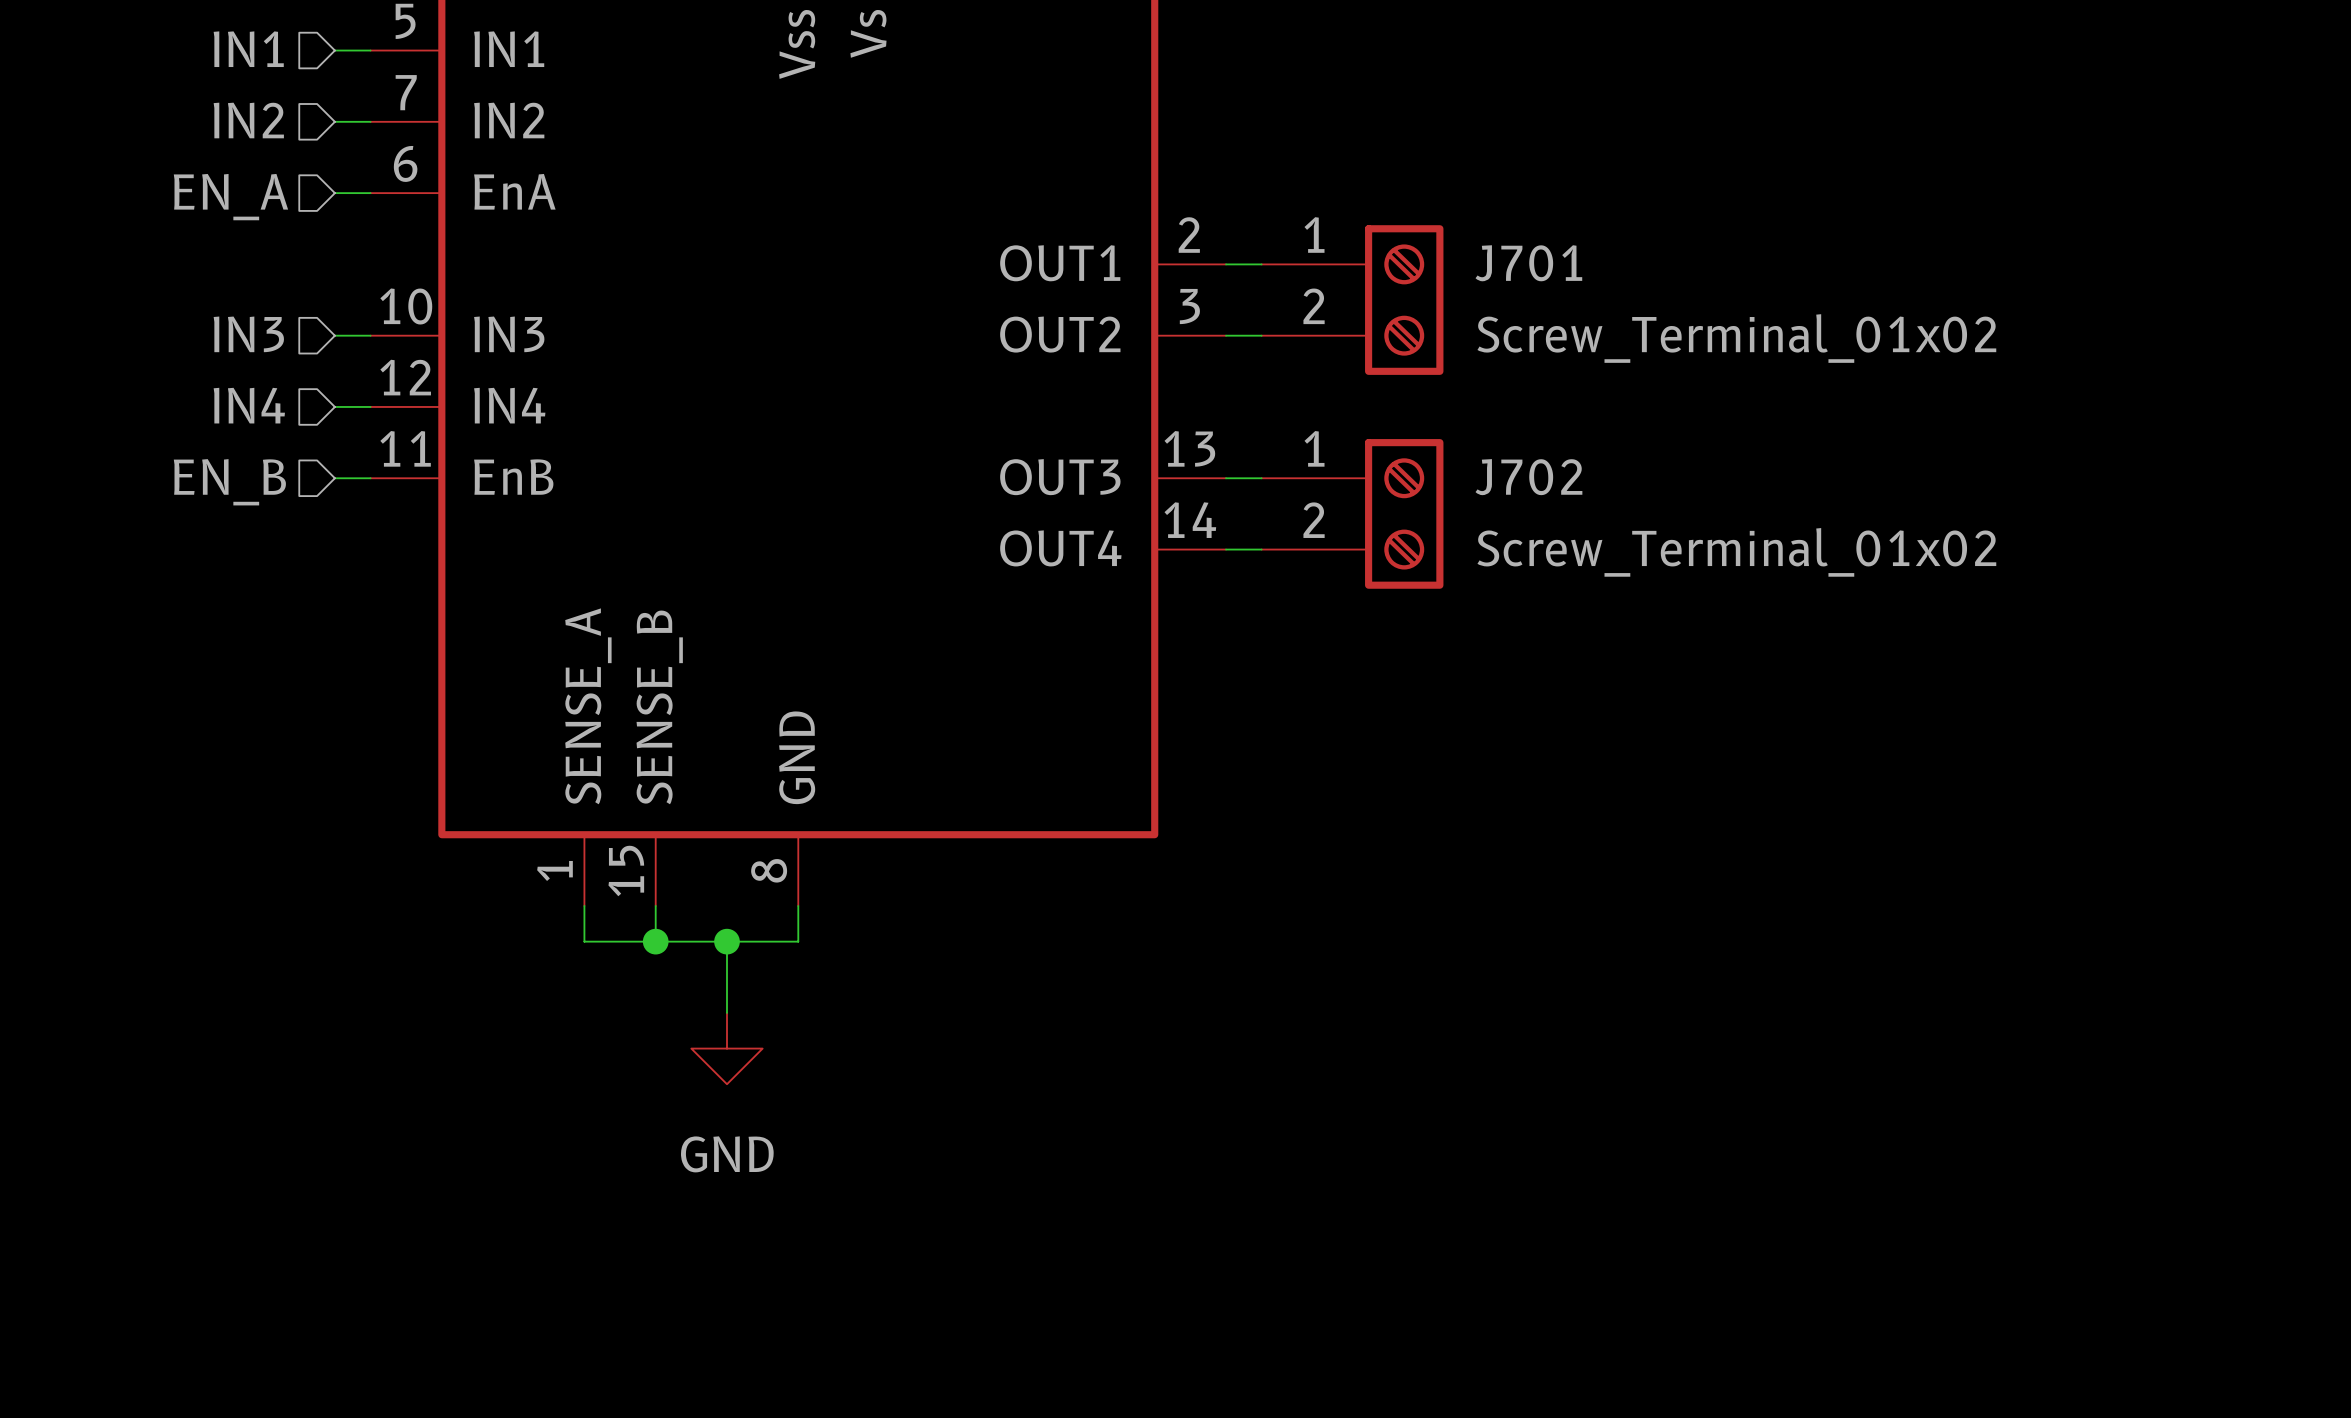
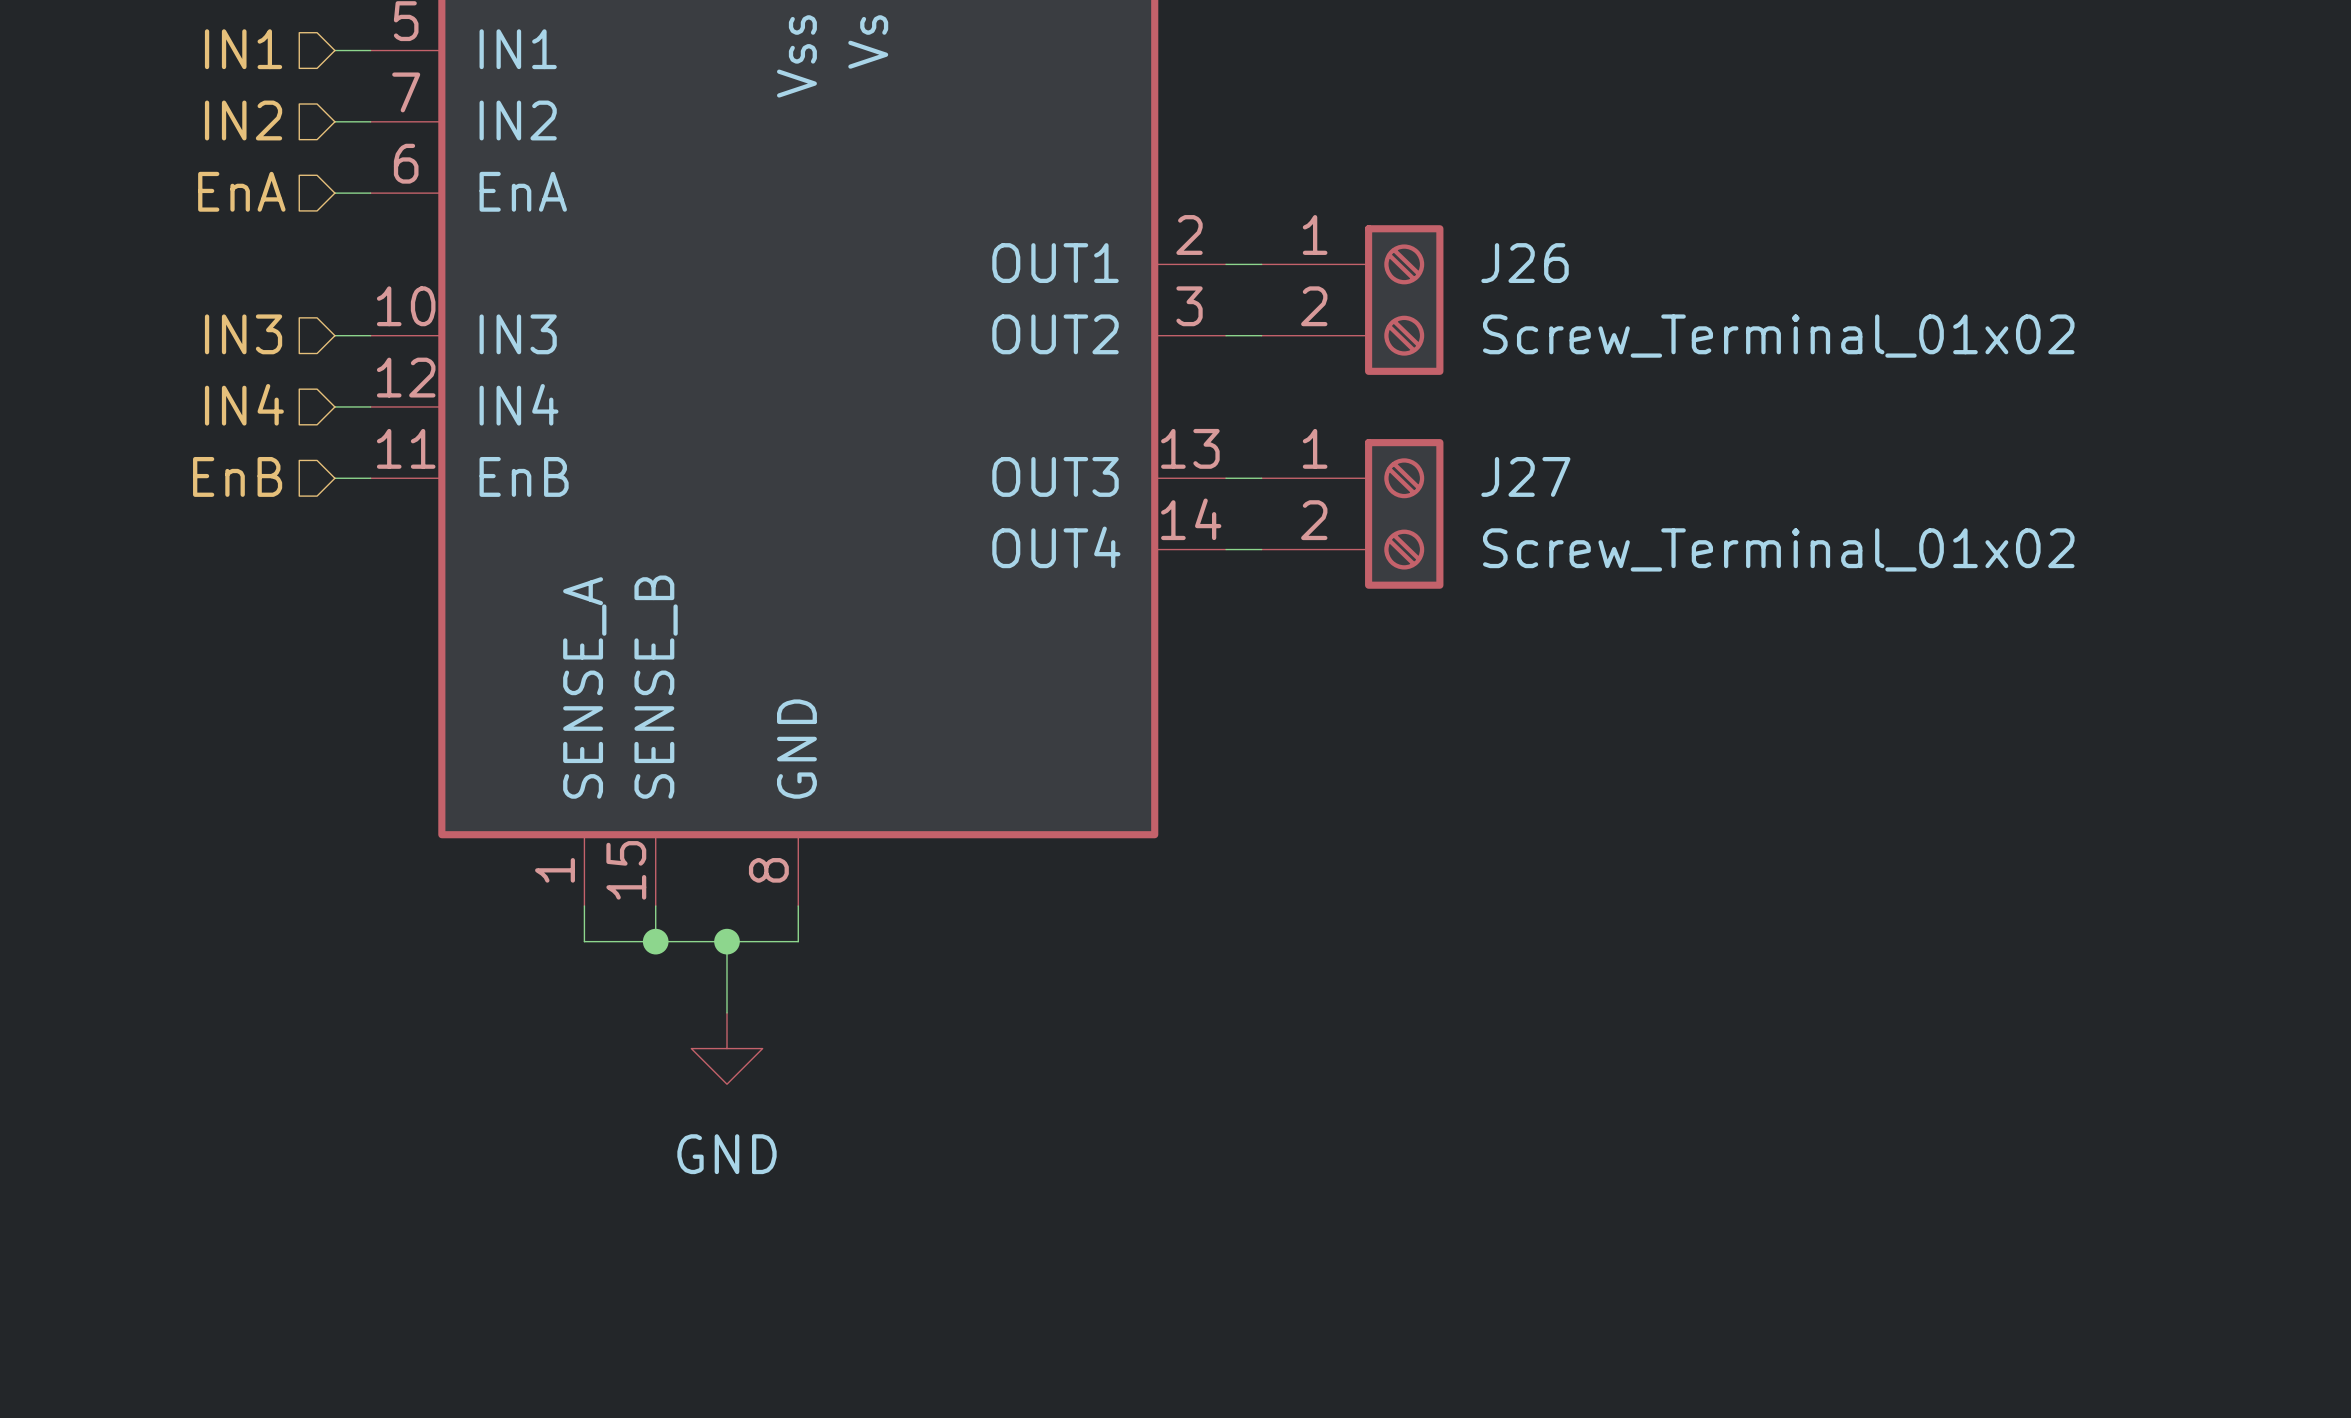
hierarchical label: EN_A (230, 197) -> EnA (241, 191)
J701 name: J701 (1528, 263) -> J26 (1525, 263)
J702 name: J702 (1528, 477) -> J27 (1525, 476)
hierarchical label: EN_B (229, 482) -> EnB (237, 476)

